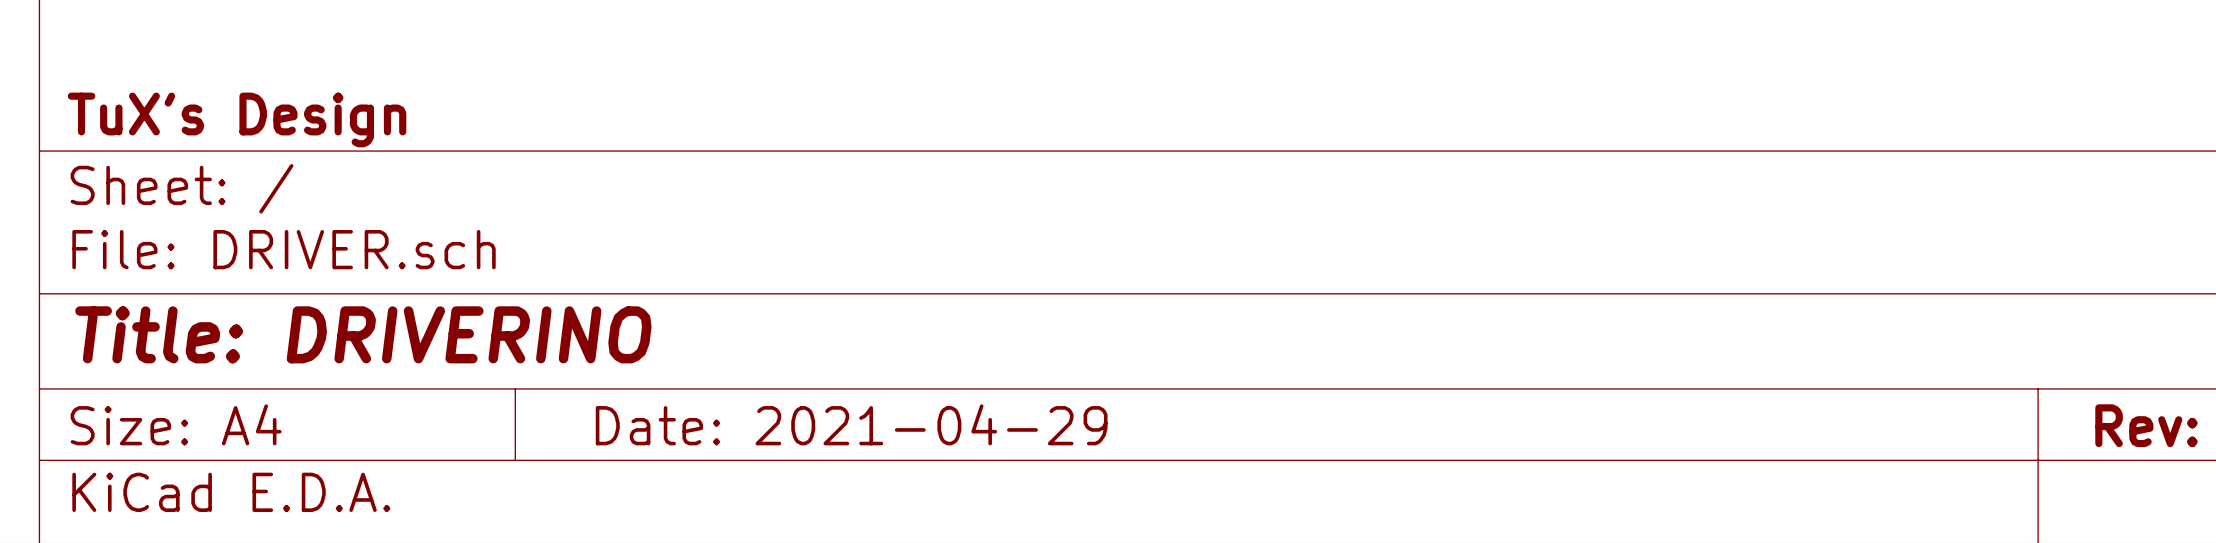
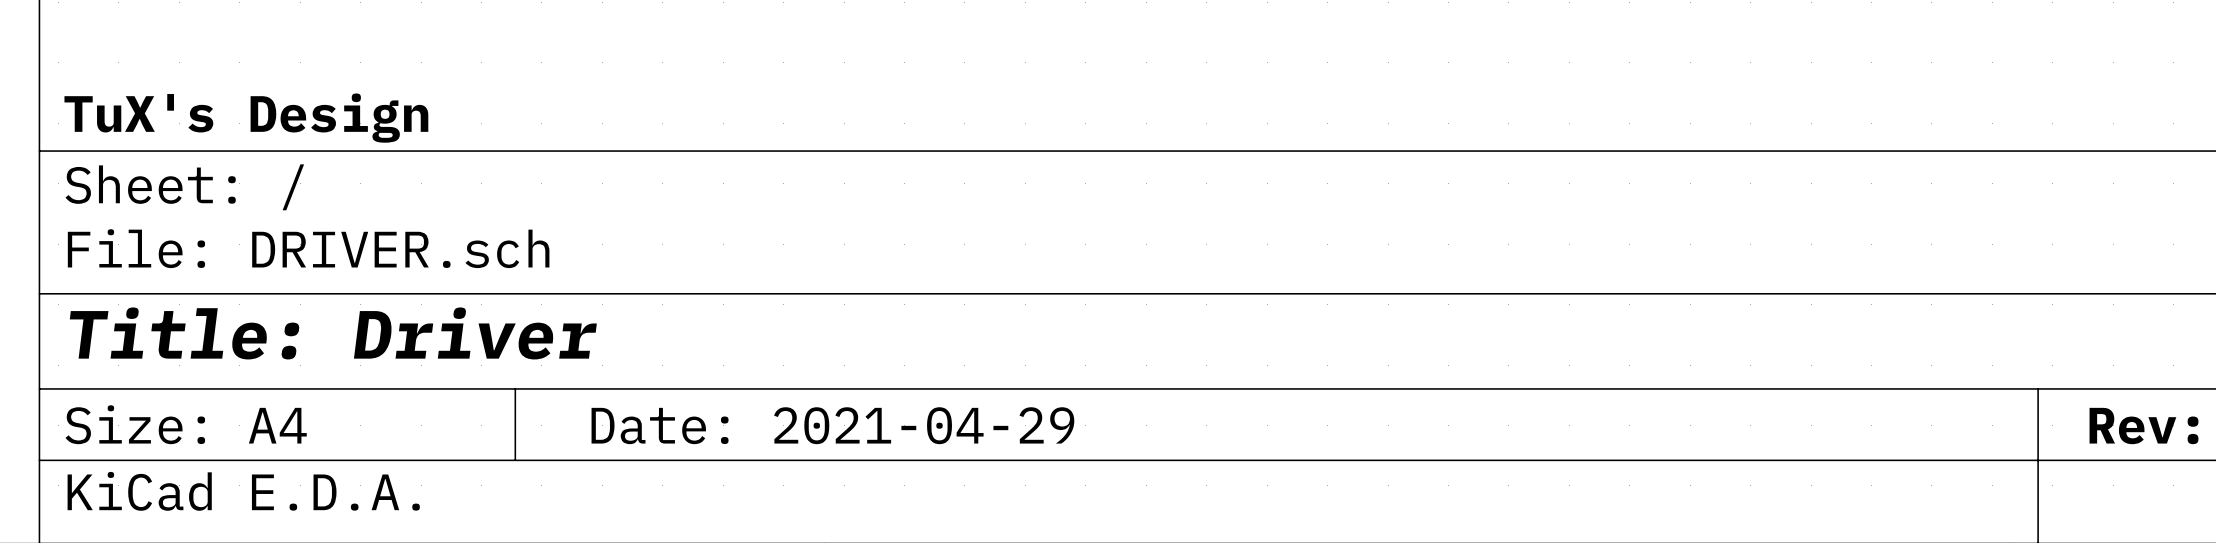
title block: Title: DRIVERINO (363, 334) -> Title: Driver (333, 333)

